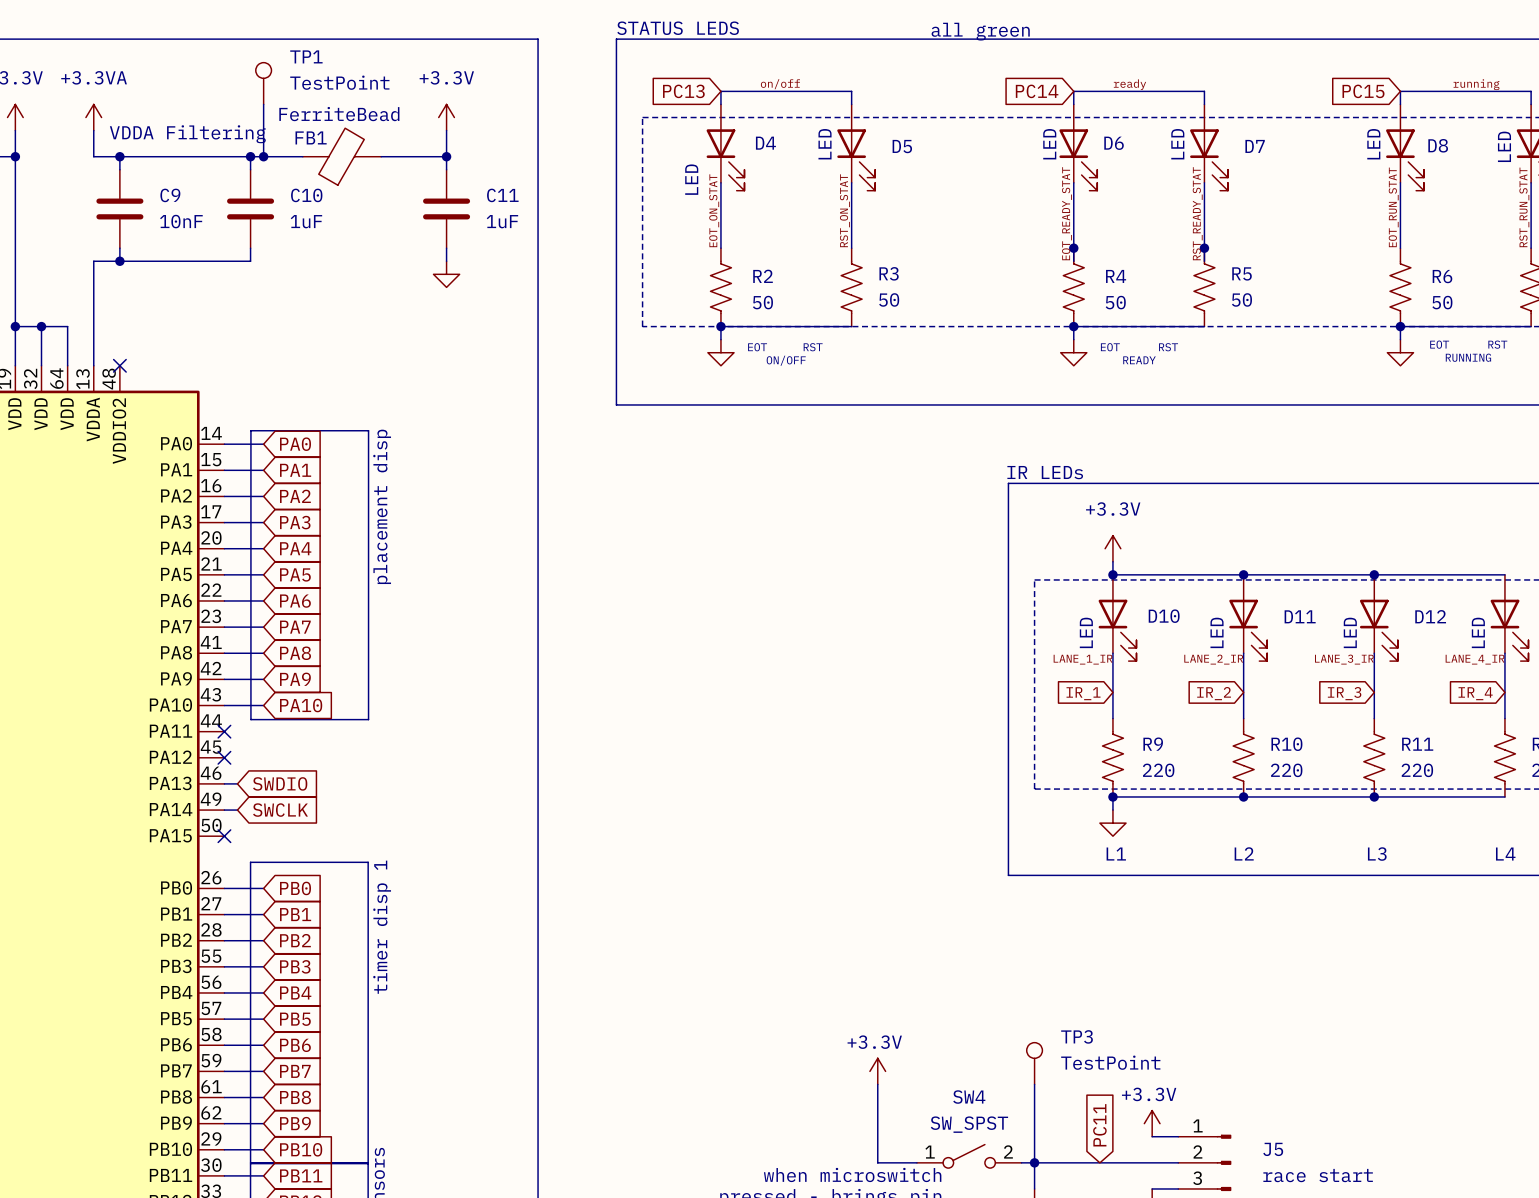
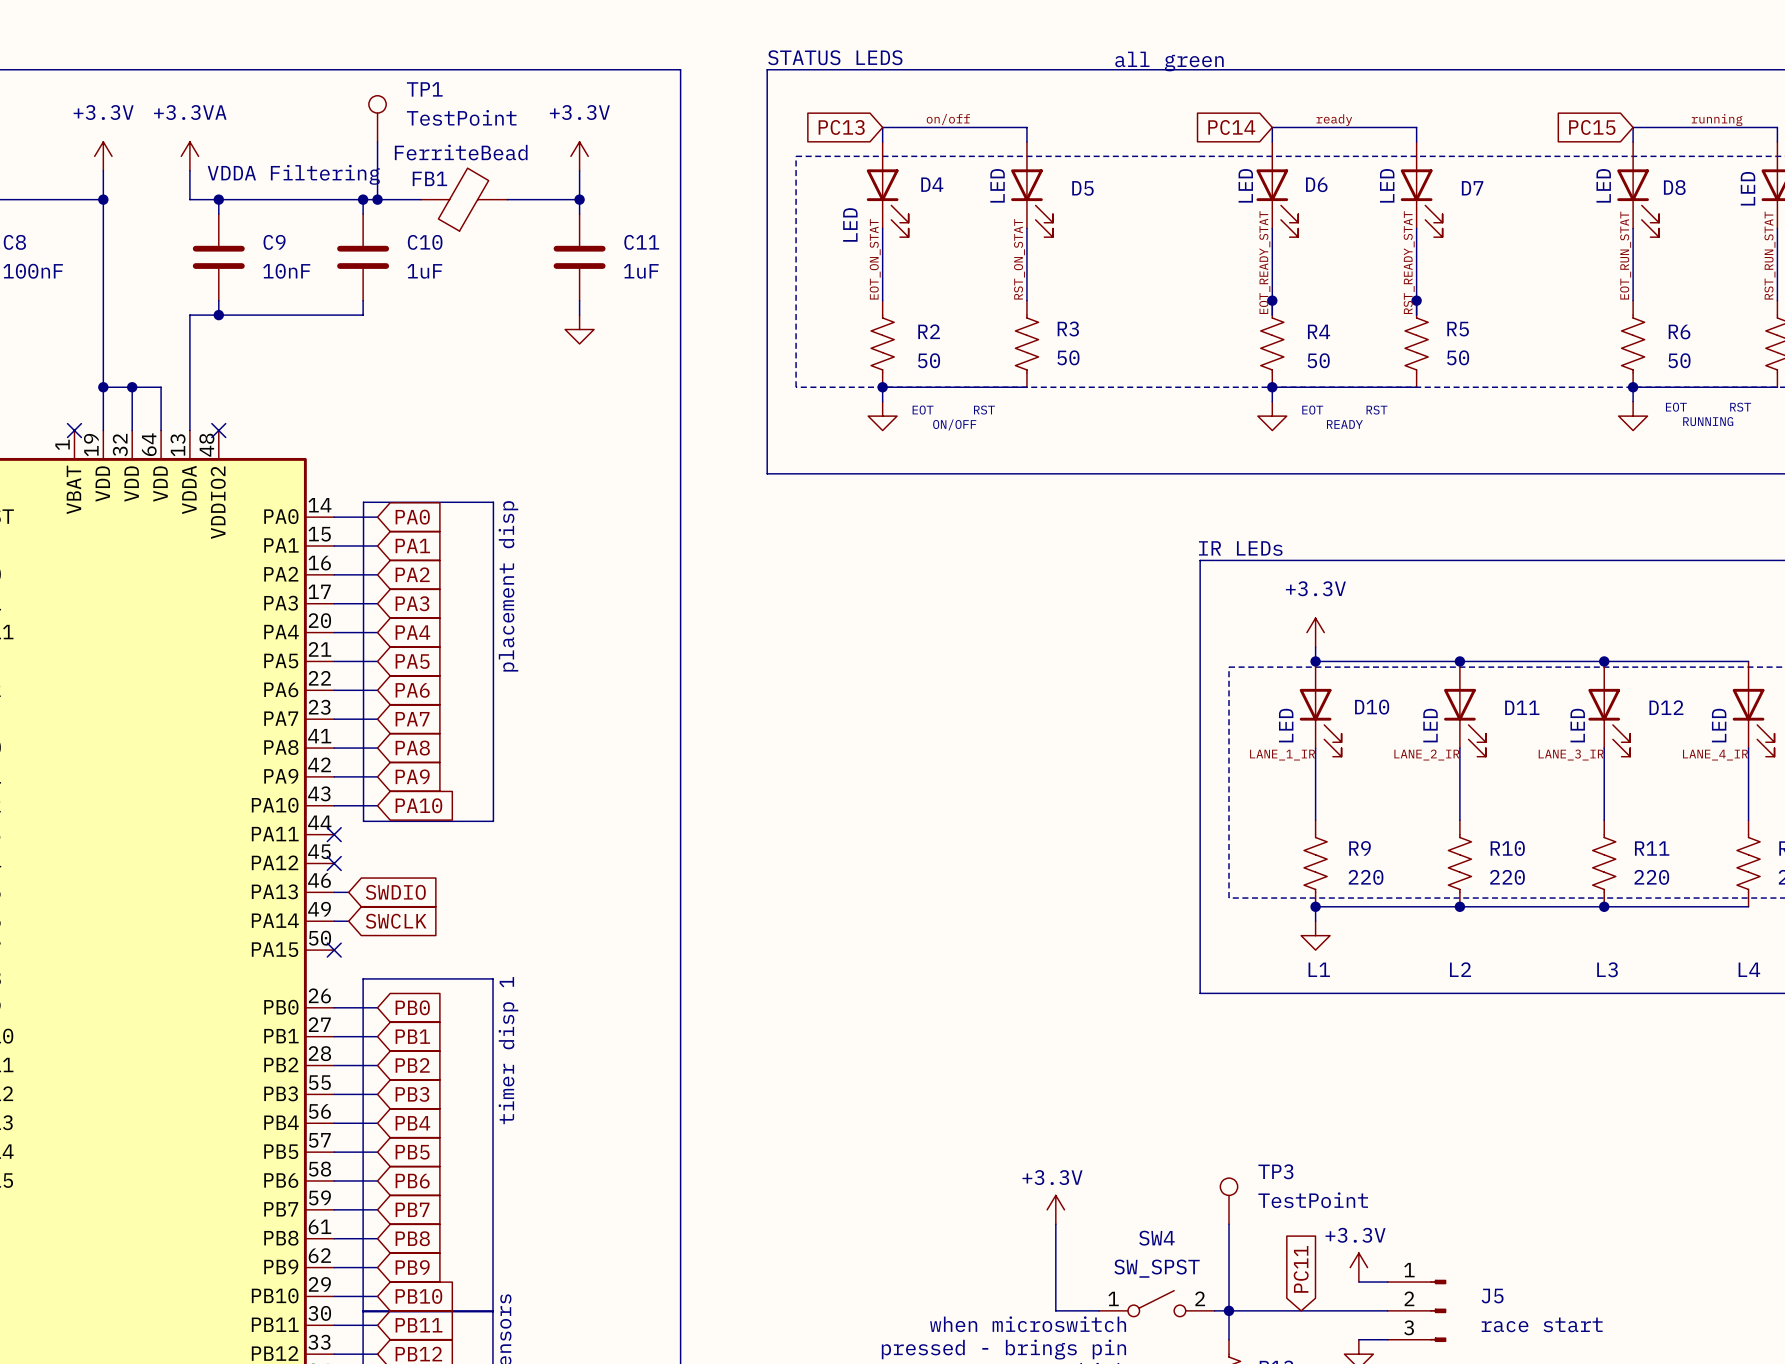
global label: IR_1 (1083, 693) -> none
global label: IR_2 (1214, 693) -> none
global label: IR_3 (1344, 693) -> none
global label: IR_4 (1475, 693) -> none

